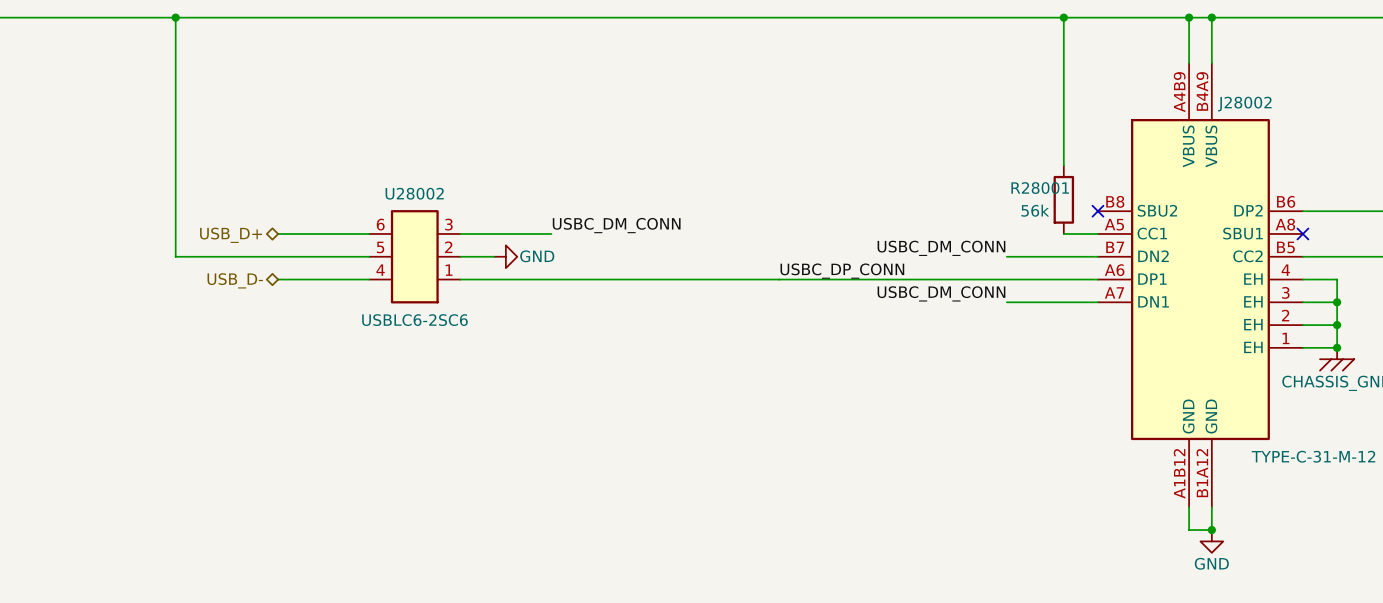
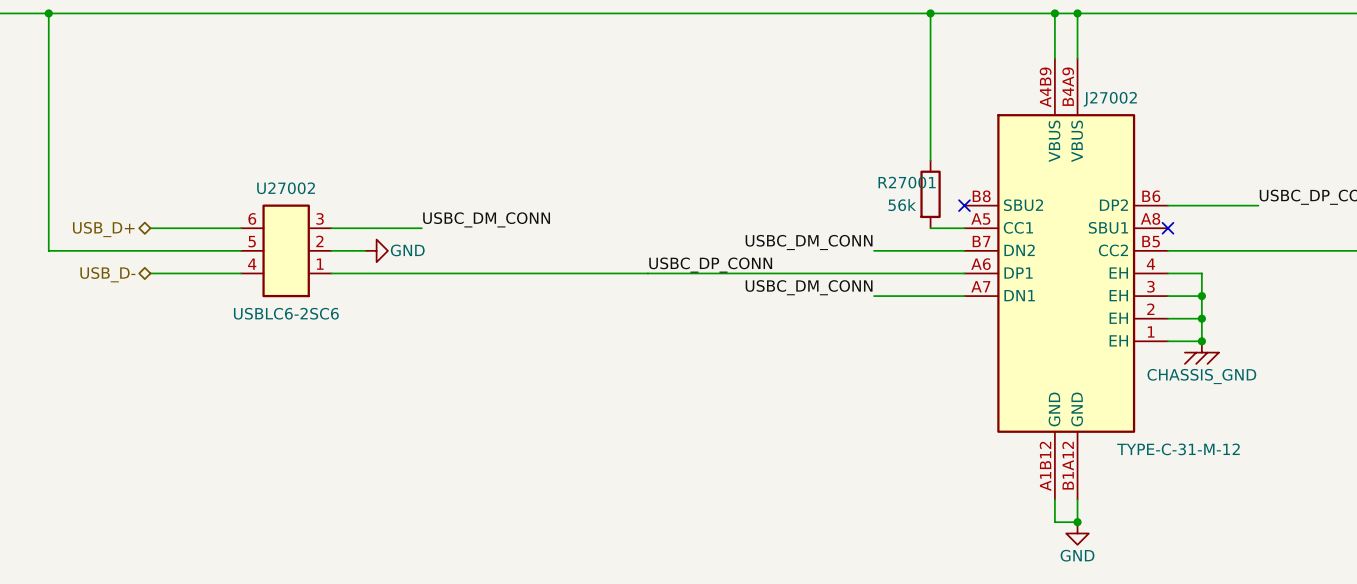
J28002 name: J28002 (1244, 104) -> J27002 (1110, 99)
R28001 name: R28001 (1040, 188) -> R27001 (907, 182)
U28002 name: U28002 (414, 193) -> U27002 (286, 188)

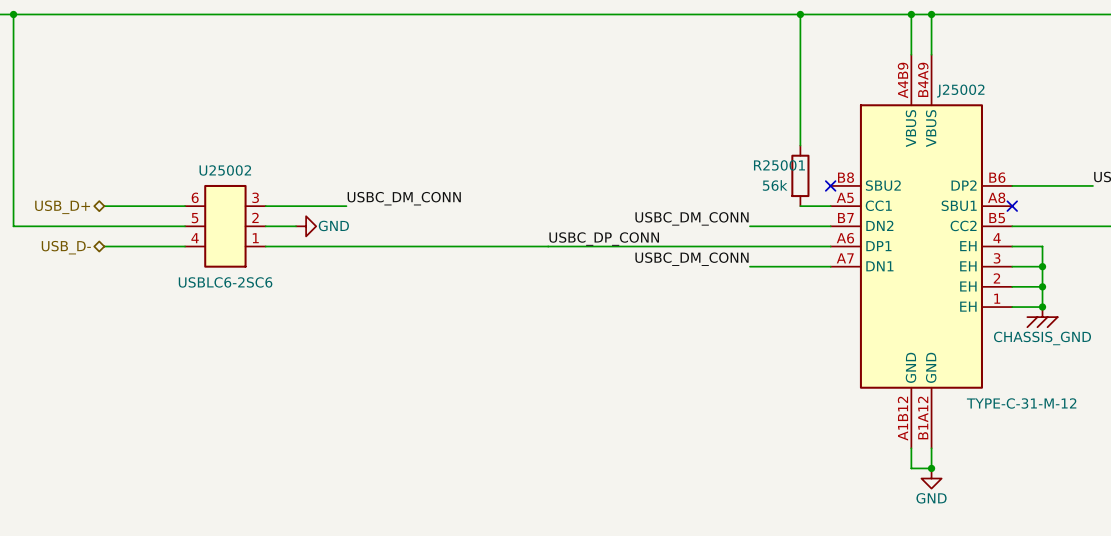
J27002 name: J27002 (1110, 99) -> J25002 (960, 91)
R27001 name: R27001 (907, 182) -> R25001 (779, 165)
U27002 name: U27002 (286, 188) -> U25002 (225, 170)

